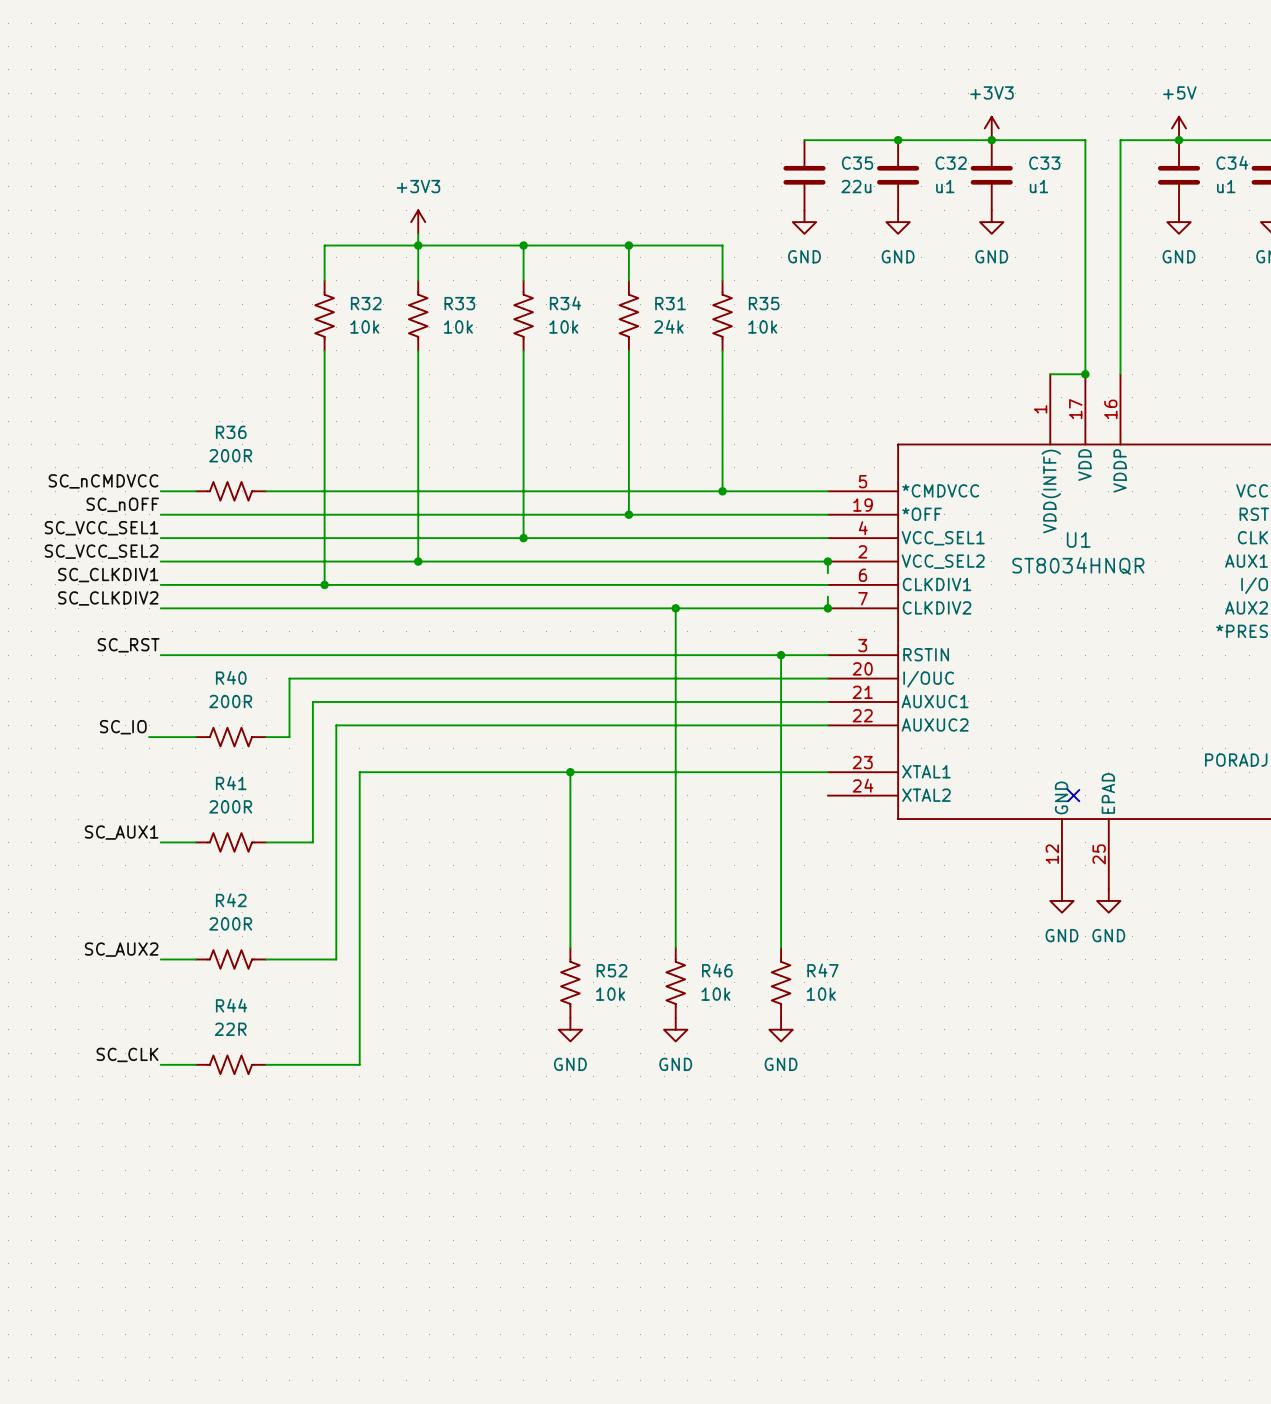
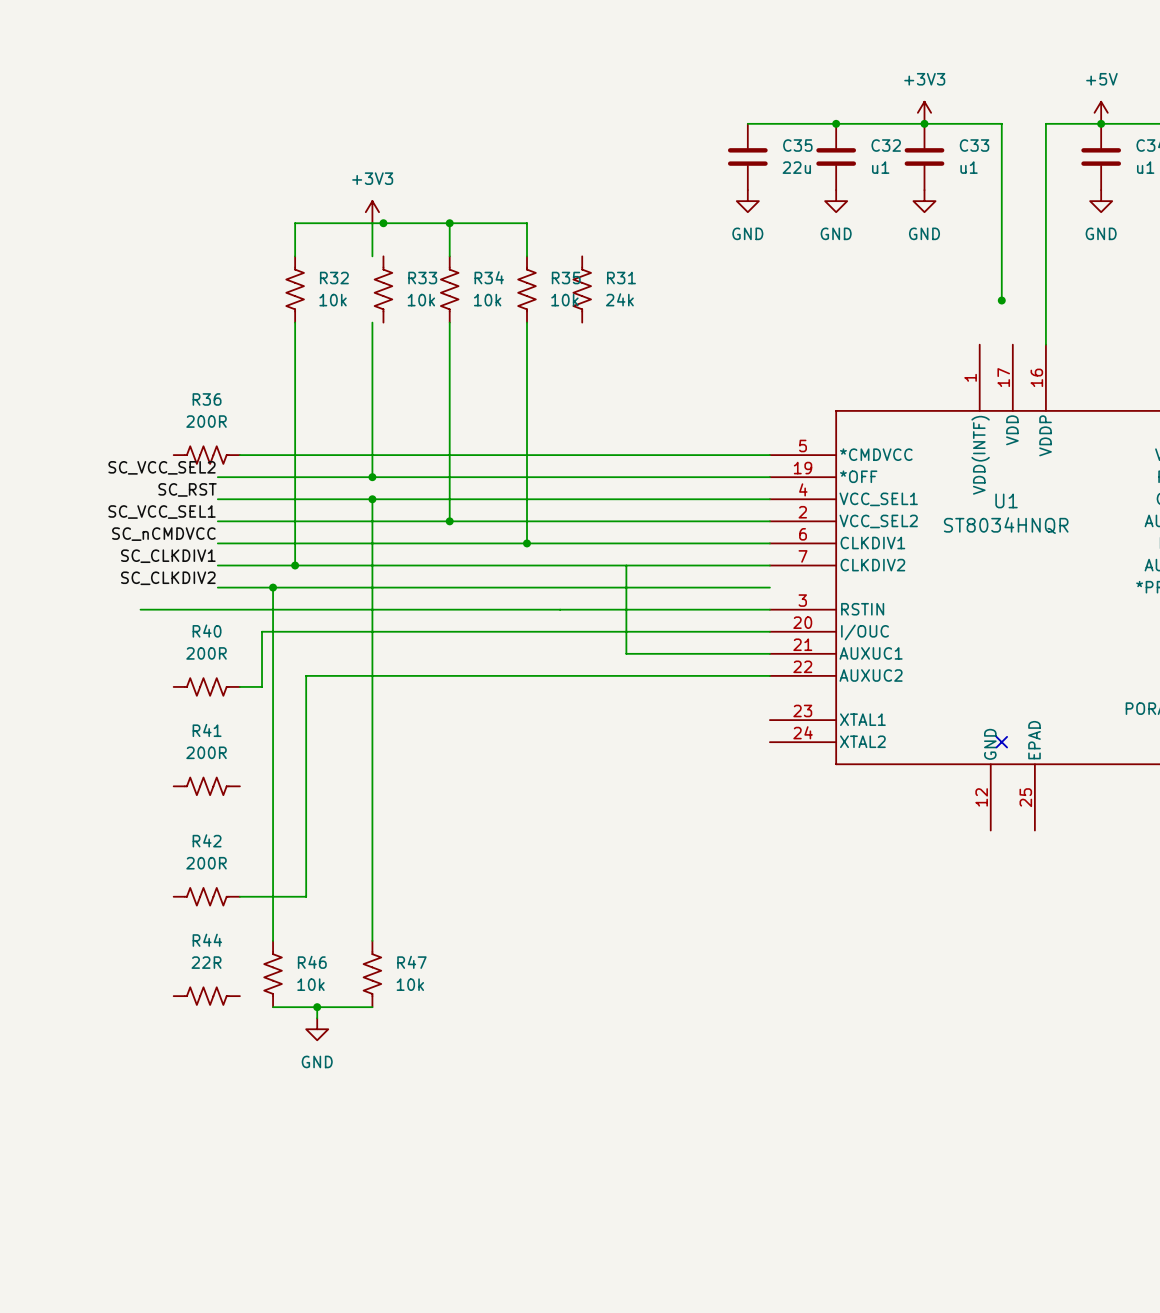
wire: (1073, 140) (1085, 140) (1085, 374) (1050, 374) -> (1001, 123) (1001, 300)
power symbol position: +3V3 (418, 222) -> +3V3 (372, 212)
wire: (418, 233) (418, 280) -> none
wire: (523, 245) (523, 280) -> (449, 223) (449, 256)
junction position: (523, 245) -> (449, 223)
wire: (570, 245) (722, 245) (722, 280) -> (527, 223) (527, 256)
wire: (628, 245) (628, 280) -> (372, 223) (372, 256)
junction: (628, 245) -> none
R34 position: (523, 315) -> (449, 289)
R35 position: (722, 315) -> (527, 289)
wire: (418, 350) (418, 561) -> (449, 322) (449, 521)
wire: (523, 350) (523, 538) -> none
wire: none -> (527, 322) (527, 543)
wire: (628, 350) (628, 514) -> (372, 322) (372, 477)
wire: (722, 350) (722, 491) -> none
junction position: (1085, 374) -> (1001, 300)
label position: SC_nCMDVCC (103, 481) -> SC_nCMDVCC (163, 534)
wire: (160, 491) (195, 491) -> none
junction: (722, 491) -> none
label: SC_nOFF (122, 504) -> none
wire: (160, 514) (242, 514) -> none
junction: none -> (372, 477)
junction: (628, 514) -> none
label position: SC_VCC_SEL1 (101, 528) -> SC_VCC_SEL1 (162, 512)
wire: (160, 538) (242, 538) -> none
wire: none -> (372, 499) (372, 940)
junction: none -> (372, 499)
junction: (523, 538) -> none
label position: SC_VCC_SEL2 (101, 551) -> SC_VCC_SEL2 (162, 467)
wire: (160, 561) (242, 561) -> none
junction: (418, 561) -> none
junction: none -> (449, 521)
wire: (827, 561) (827, 573) -> none
junction: (827, 561) -> none
label position: SC_CLKDIV1 (108, 575) -> SC_CLKDIV1 (168, 556)
wire: (160, 584) (242, 584) -> none
wire: none -> (295, 543) (295, 565)
junction position: (324, 584) -> (295, 565)
junction: none -> (527, 543)
wire: (827, 596) (827, 608) -> none
label position: SC_CLKDIV2 (108, 598) -> SC_CLKDIV2 (168, 578)
wire: (160, 608) (242, 608) -> none
junction: (675, 608) -> none
junction: (827, 608) -> none
wire: none -> (217, 587) (769, 587)
wire: none -> (273, 587) (273, 940)
junction: none -> (273, 587)
label position: SC_RST (128, 645) -> SC_RST (187, 489)
wire: (781, 655) (781, 947) -> none
junction: (781, 655) -> none
label: SC_IO (123, 727) -> none
wire: (149, 737) (195, 737) -> none
wire: (570, 772) (570, 947) -> none
junction: (570, 772) -> none
wire: (827, 772) (359, 772) (359, 1064) (266, 1064) -> none
label: SC_AUX1 (121, 832) -> none
wire: (160, 842) (195, 842) -> none
wire: (266, 842) (312, 842) (312, 701) (675, 701) (675, 947) -> none
power symbol: GND (1061, 900) -> none
power symbol: GND (1108, 900) -> none
label: SC_AUX2 (121, 949) -> none
wire: (160, 959) (195, 959) -> none
R52: 10k (570, 982) -> none
R46 position: (675, 982) -> (273, 974)
R47 position: (781, 982) -> (372, 974)
power symbol: GND (570, 1029) -> none
power symbol: GND (675, 1029) -> none
power symbol: GND (781, 1029) -> none
label: SC_CLK (127, 1054) -> none
wire: (160, 1064) (195, 1064) -> none
wire: none -> (273, 1007) (372, 1007)
wire: none -> (317, 1007) (317, 1018)
junction: none -> (317, 1007)
power symbol: none -> GND (317, 1029)

